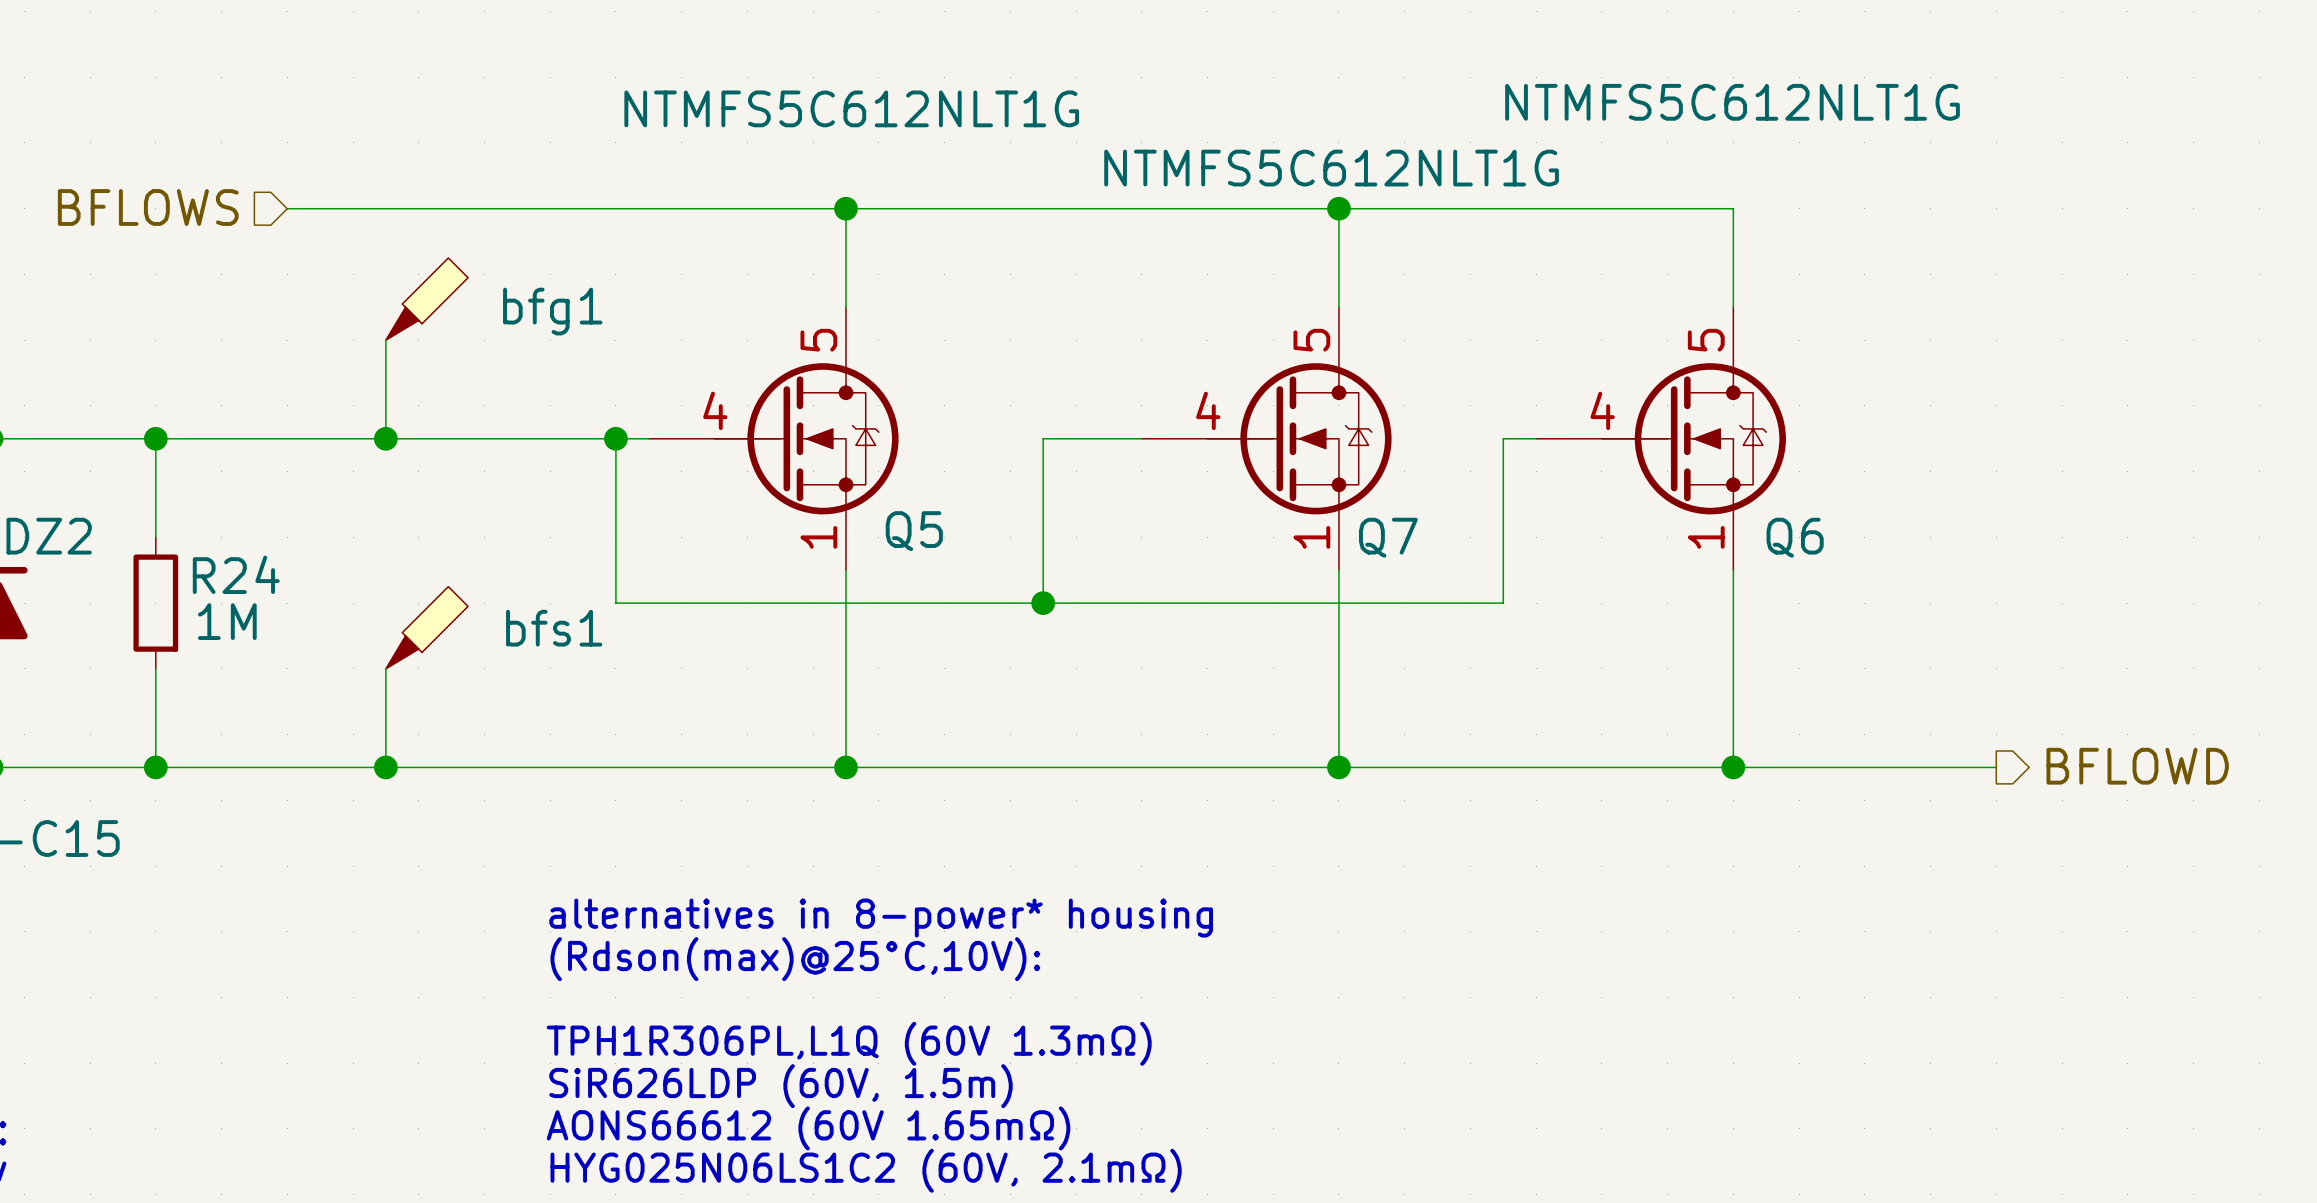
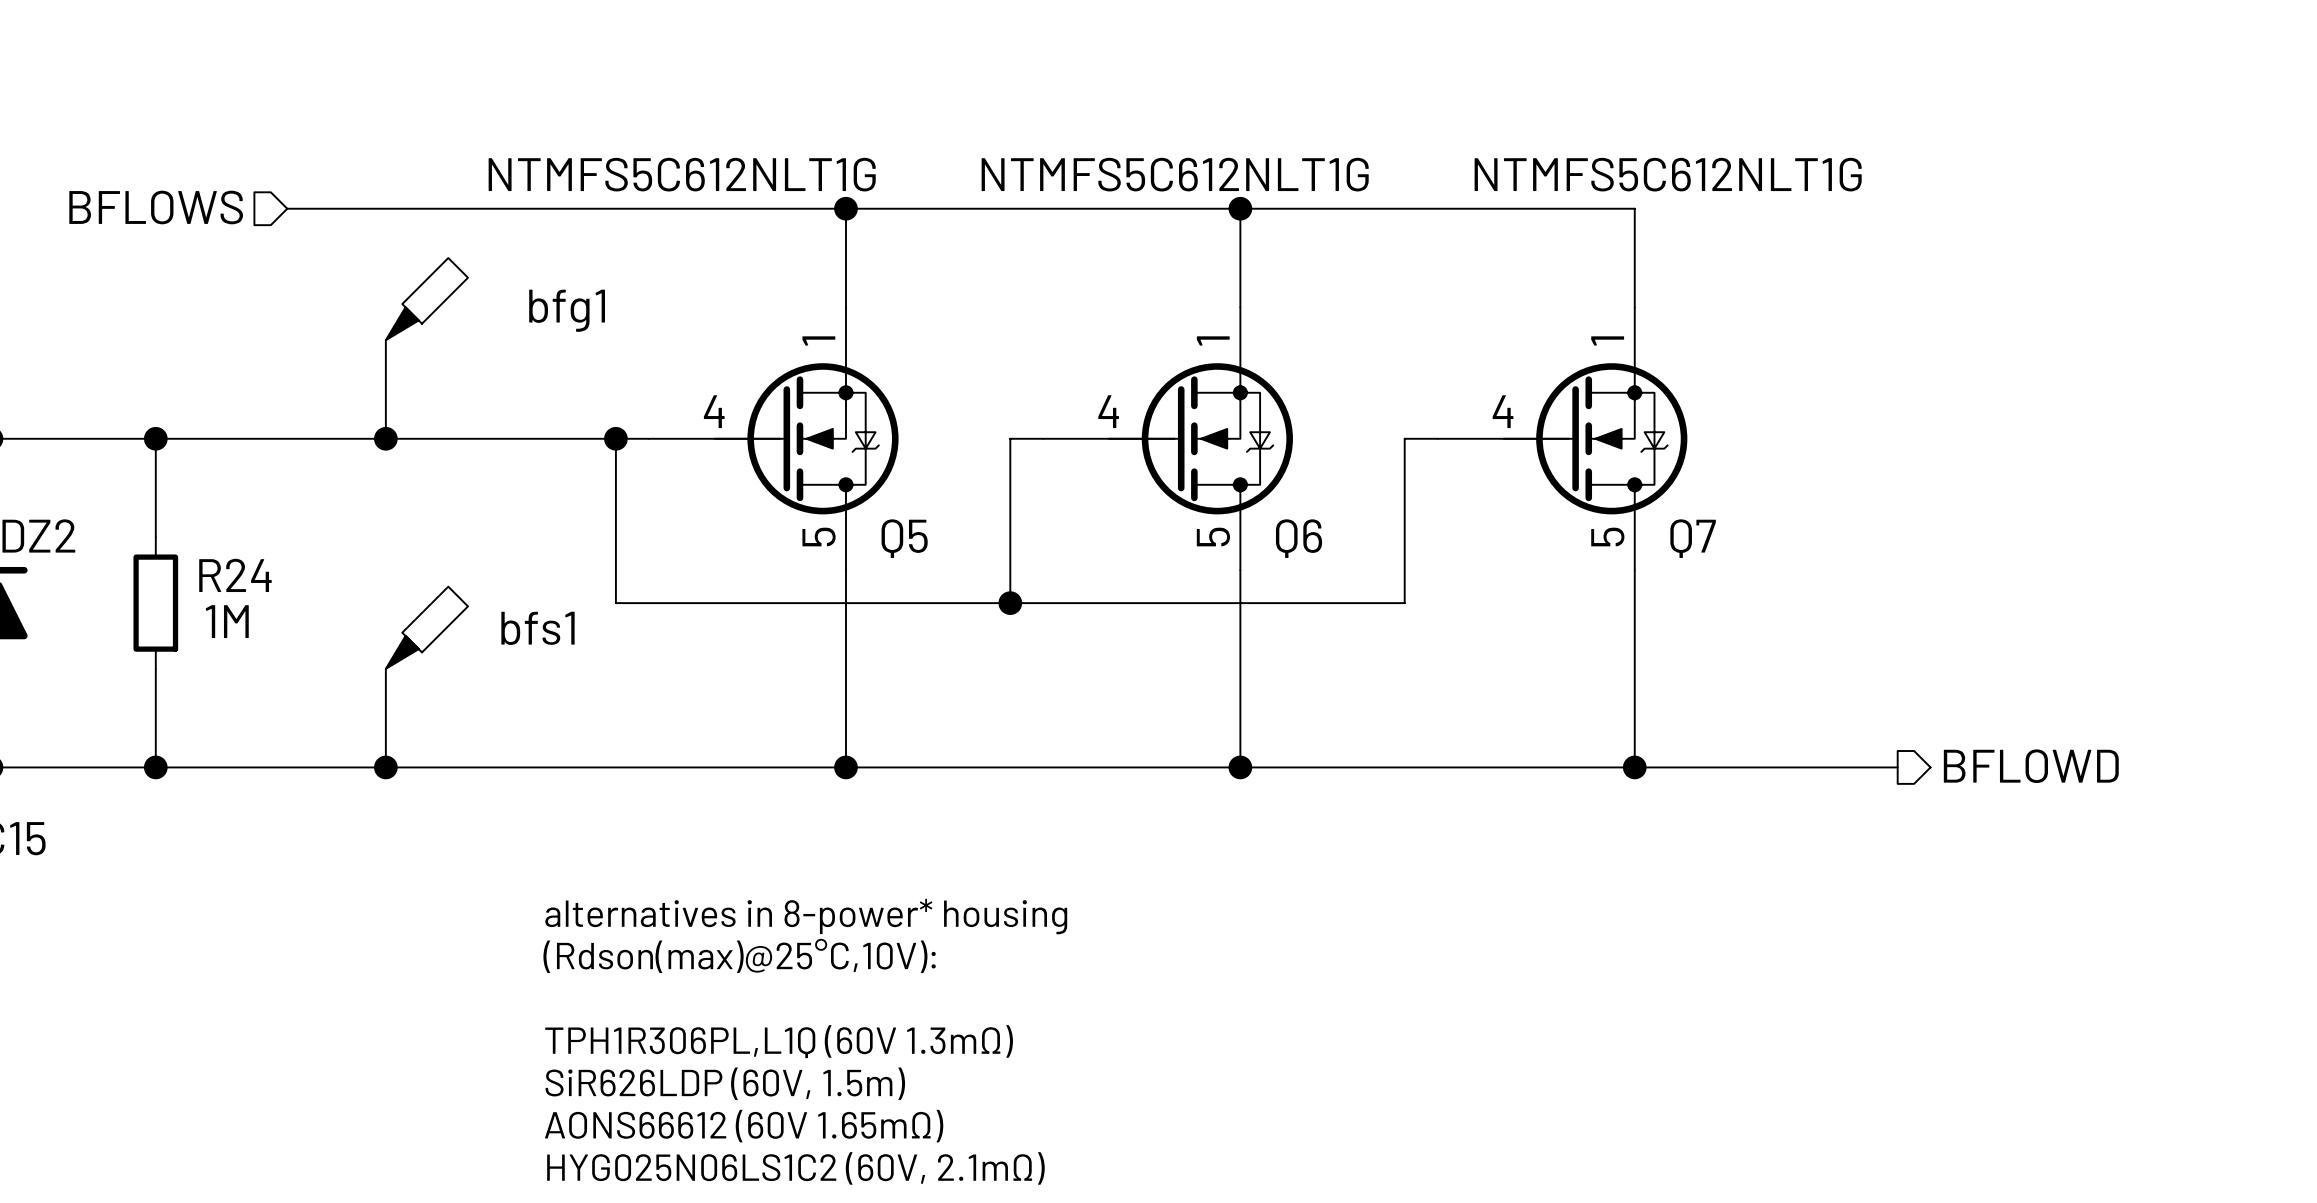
Q6 value position: NTMFS5C612NLT1G (1732, 102) -> NTMFS5C612NLT1G (1175, 174)
Q5 value position: NTMFS5C612NLT1G (851, 108) -> NTMFS5C612NLT1G (682, 174)
wire: (1338, 208) (1338, 307) -> (1240, 208) (1240, 307)
junction position: (1338, 208) -> (1240, 208)
wire: (1634, 208) (1733, 208) (1733, 307) -> (1634, 208) (1634, 307)
Q5 flip: as is (806, 438) -> up-down (806, 438)
wire: none -> (1043, 438) (1010, 438) (1010, 603)
wire: (1141, 438) (1043, 438) (1043, 603) -> none
Q7 position: (1266, 438) -> (1562, 438)
Q7 flip: as is (1299, 438) -> up-down (1595, 438)
wire: (1536, 438) (1503, 438) (1503, 603) (1404, 603) -> (1437, 438) (1404, 438) (1404, 603)
Q6 position: (1661, 438) -> (1168, 438)
Q6 flip: as is (1693, 438) -> up-down (1200, 438)
wire: (1338, 570) (1338, 767) -> (1240, 570) (1240, 767)
wire: (1733, 570) (1733, 767) -> (1634, 570) (1634, 767)
junction position: (1043, 603) -> (1010, 603)
hierarchical label position: BFLOWD (2137, 766) -> BFLOWD (2031, 766)
junction position: (1338, 767) -> (1240, 767)
junction position: (1733, 767) -> (1634, 767)
wire: (1897, 767) (1996, 767) -> none

